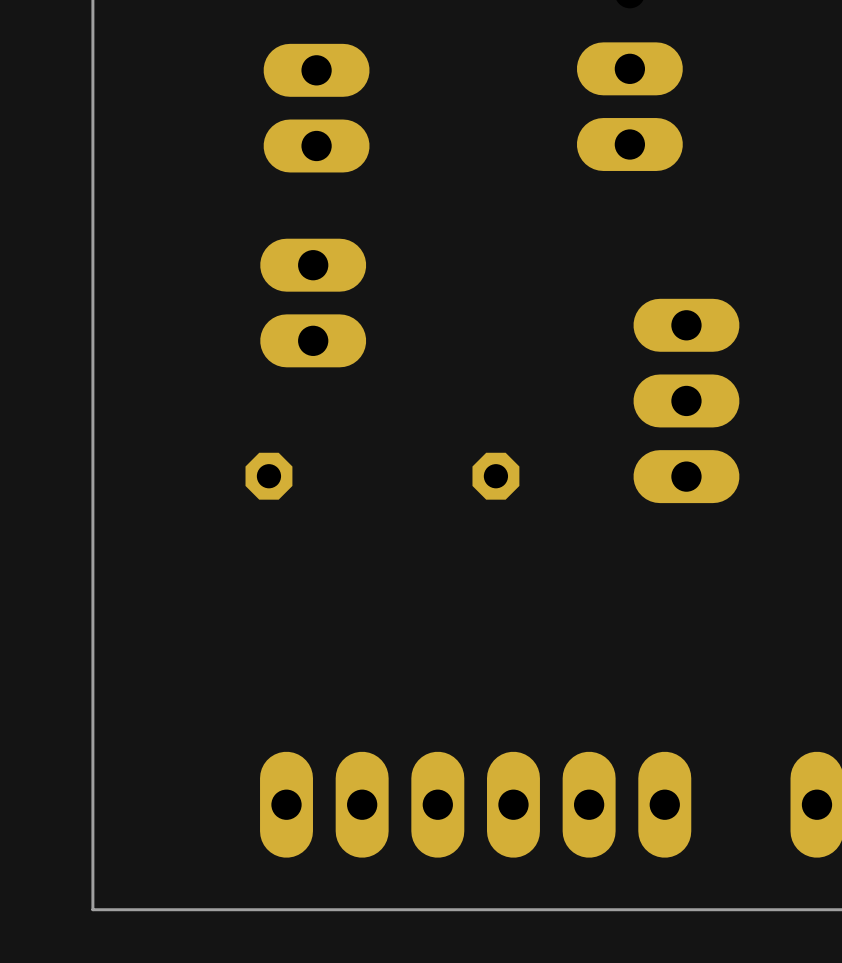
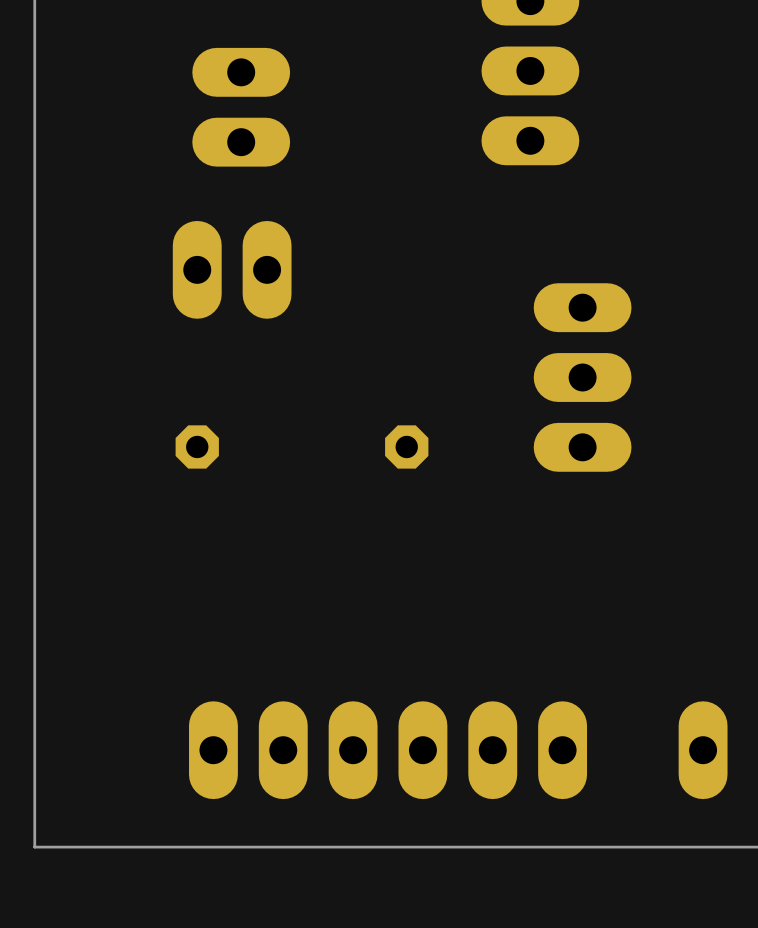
part rotation: 0° (313, 303) -> 90° clockwise (232, 269)

